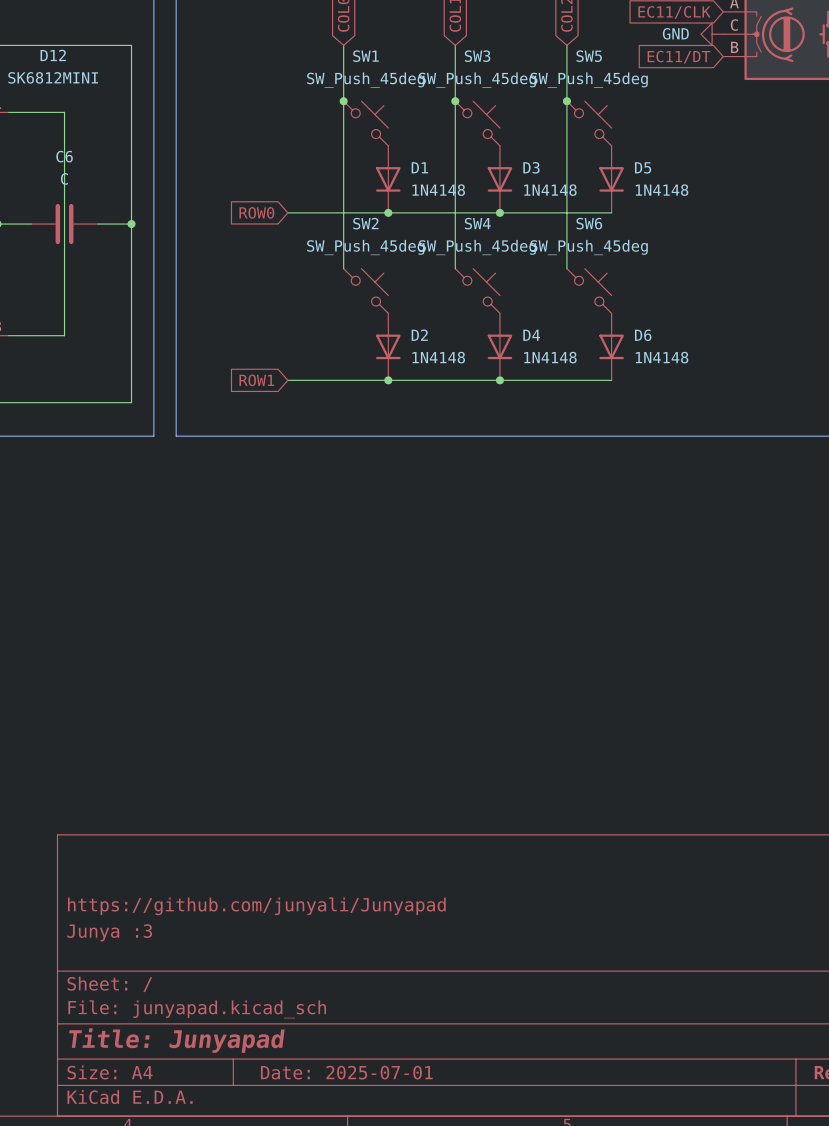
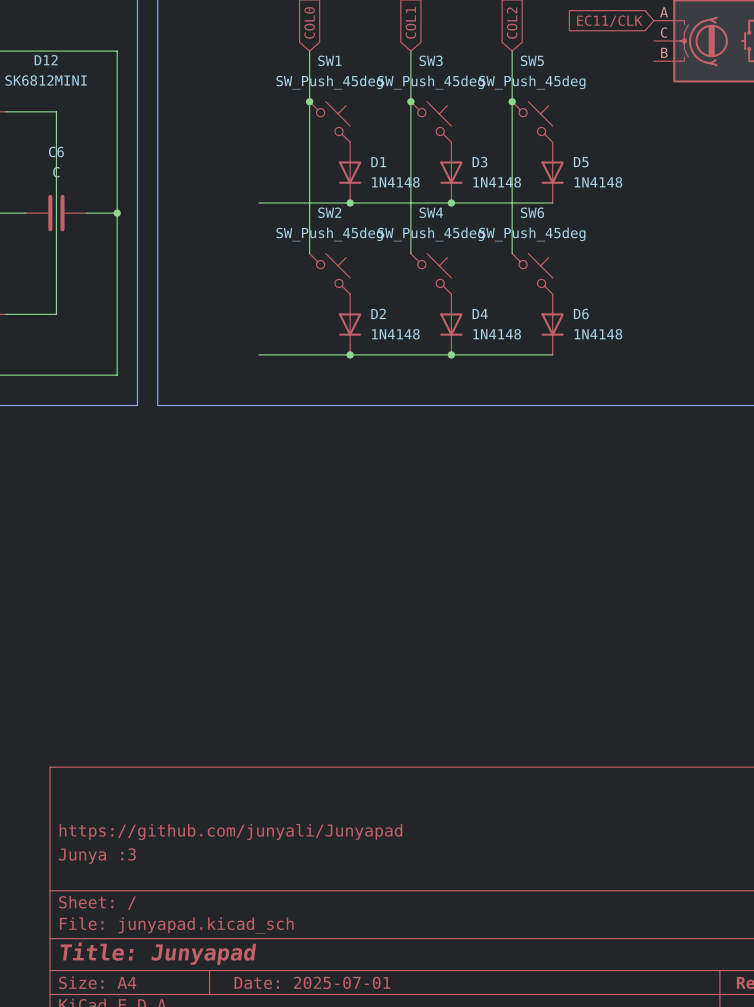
power symbol: GND (712, 34) -> none
global label: EC11/DT (678, 57) -> none
global label: ROW0 (256, 212) -> none
global label: ROW1 (256, 380) -> none

